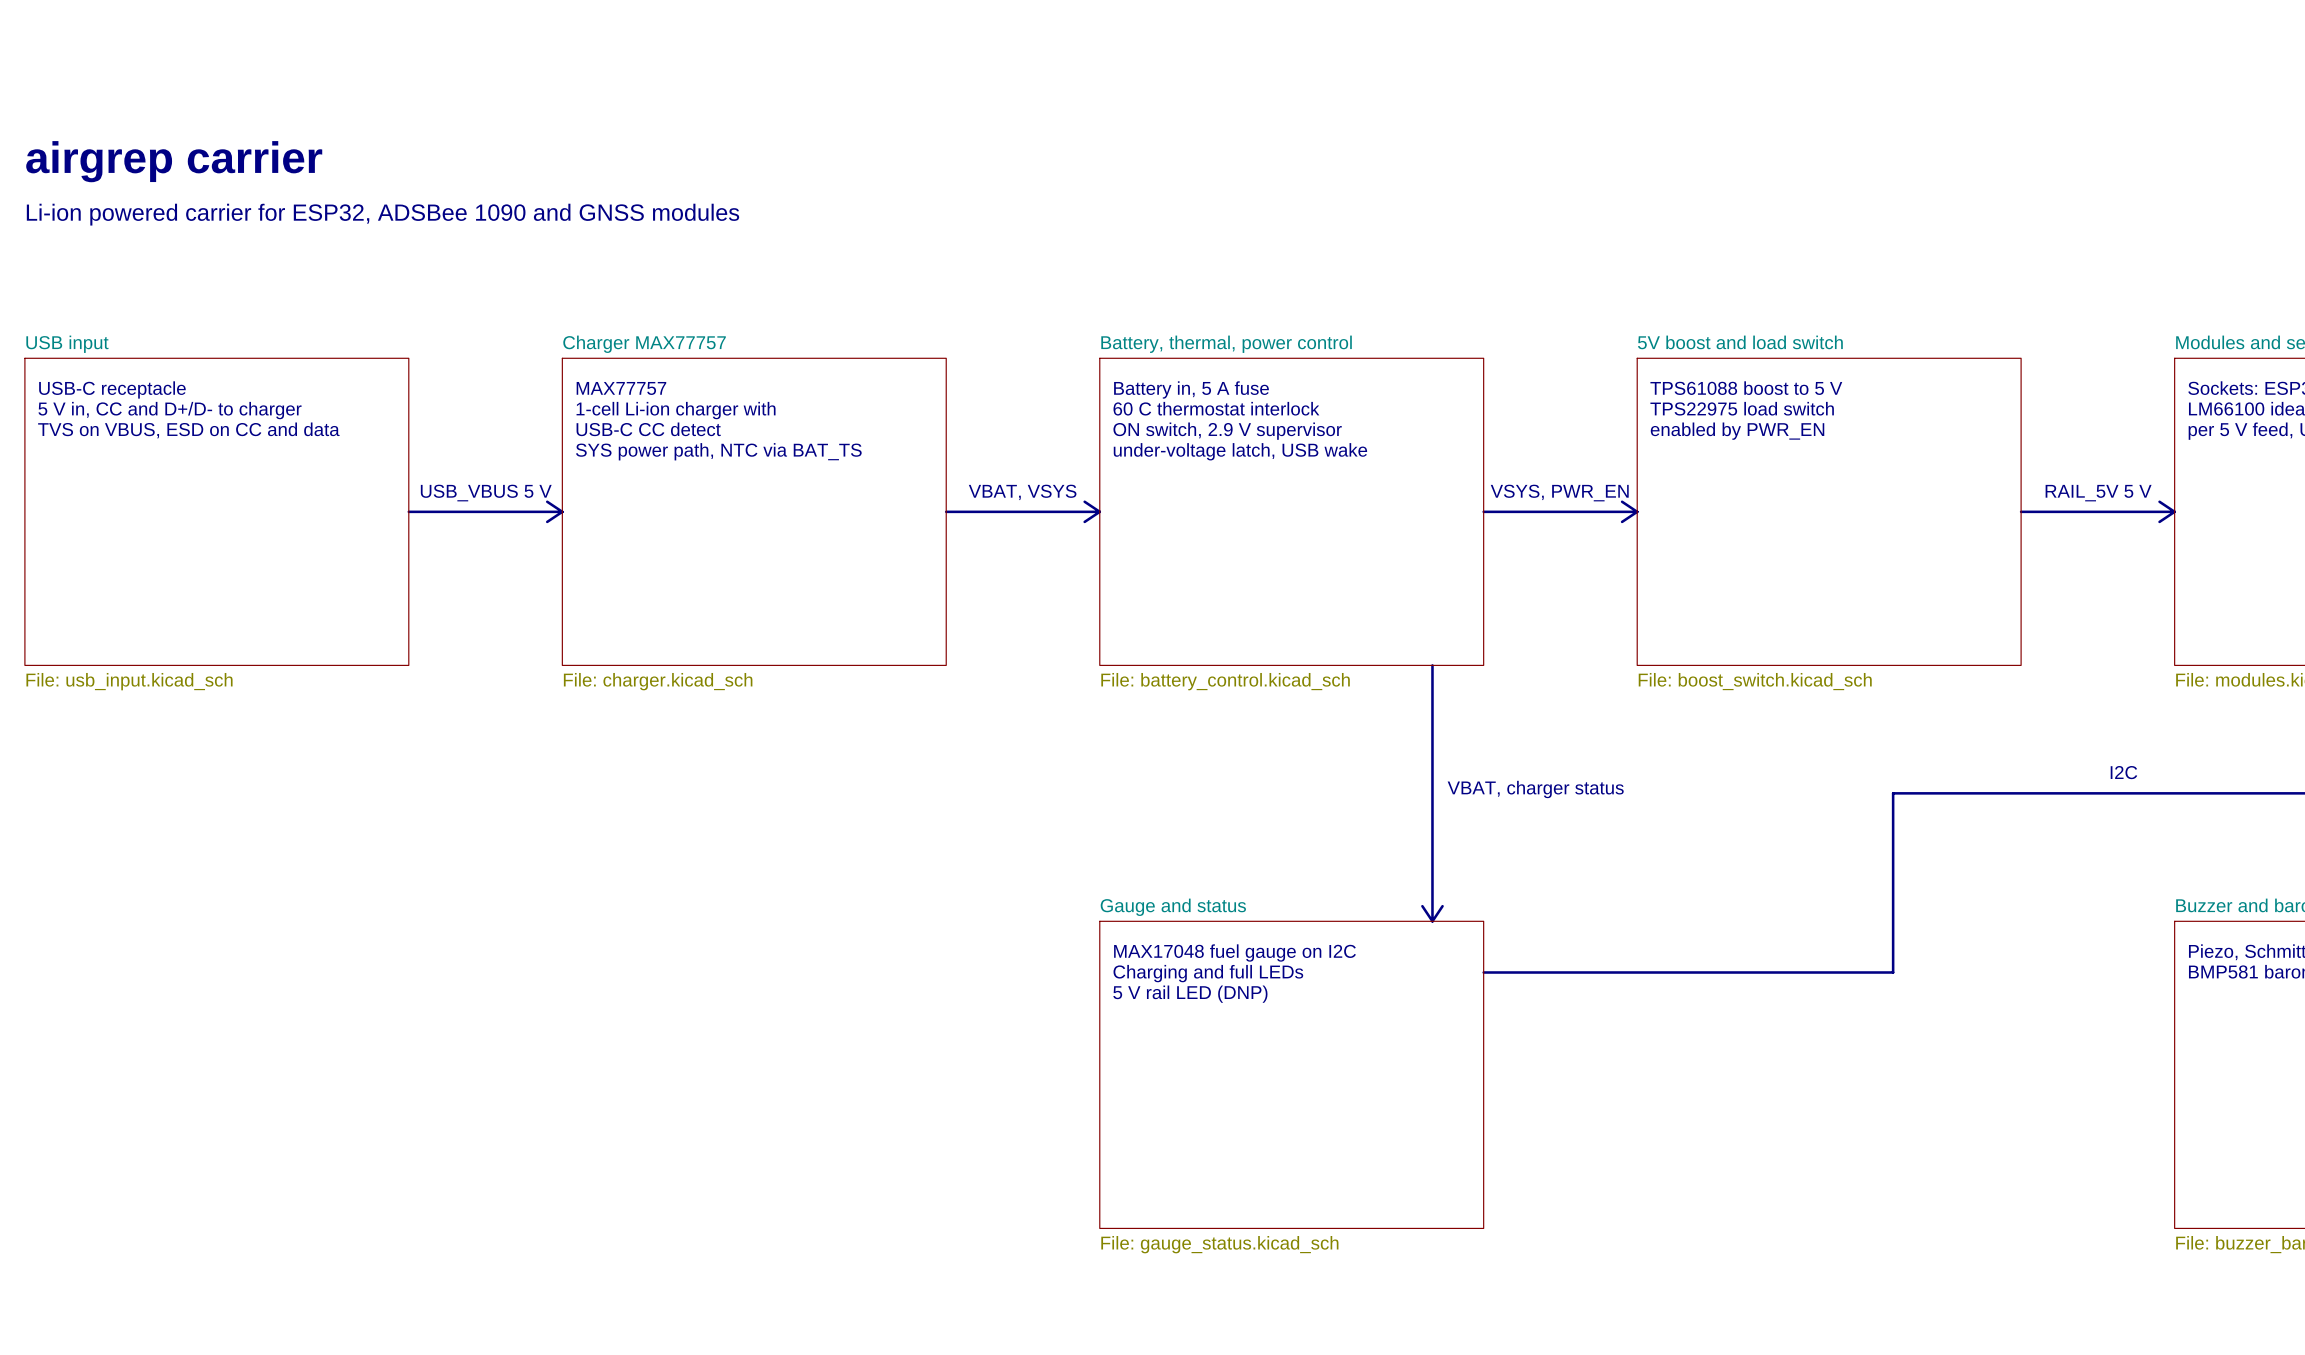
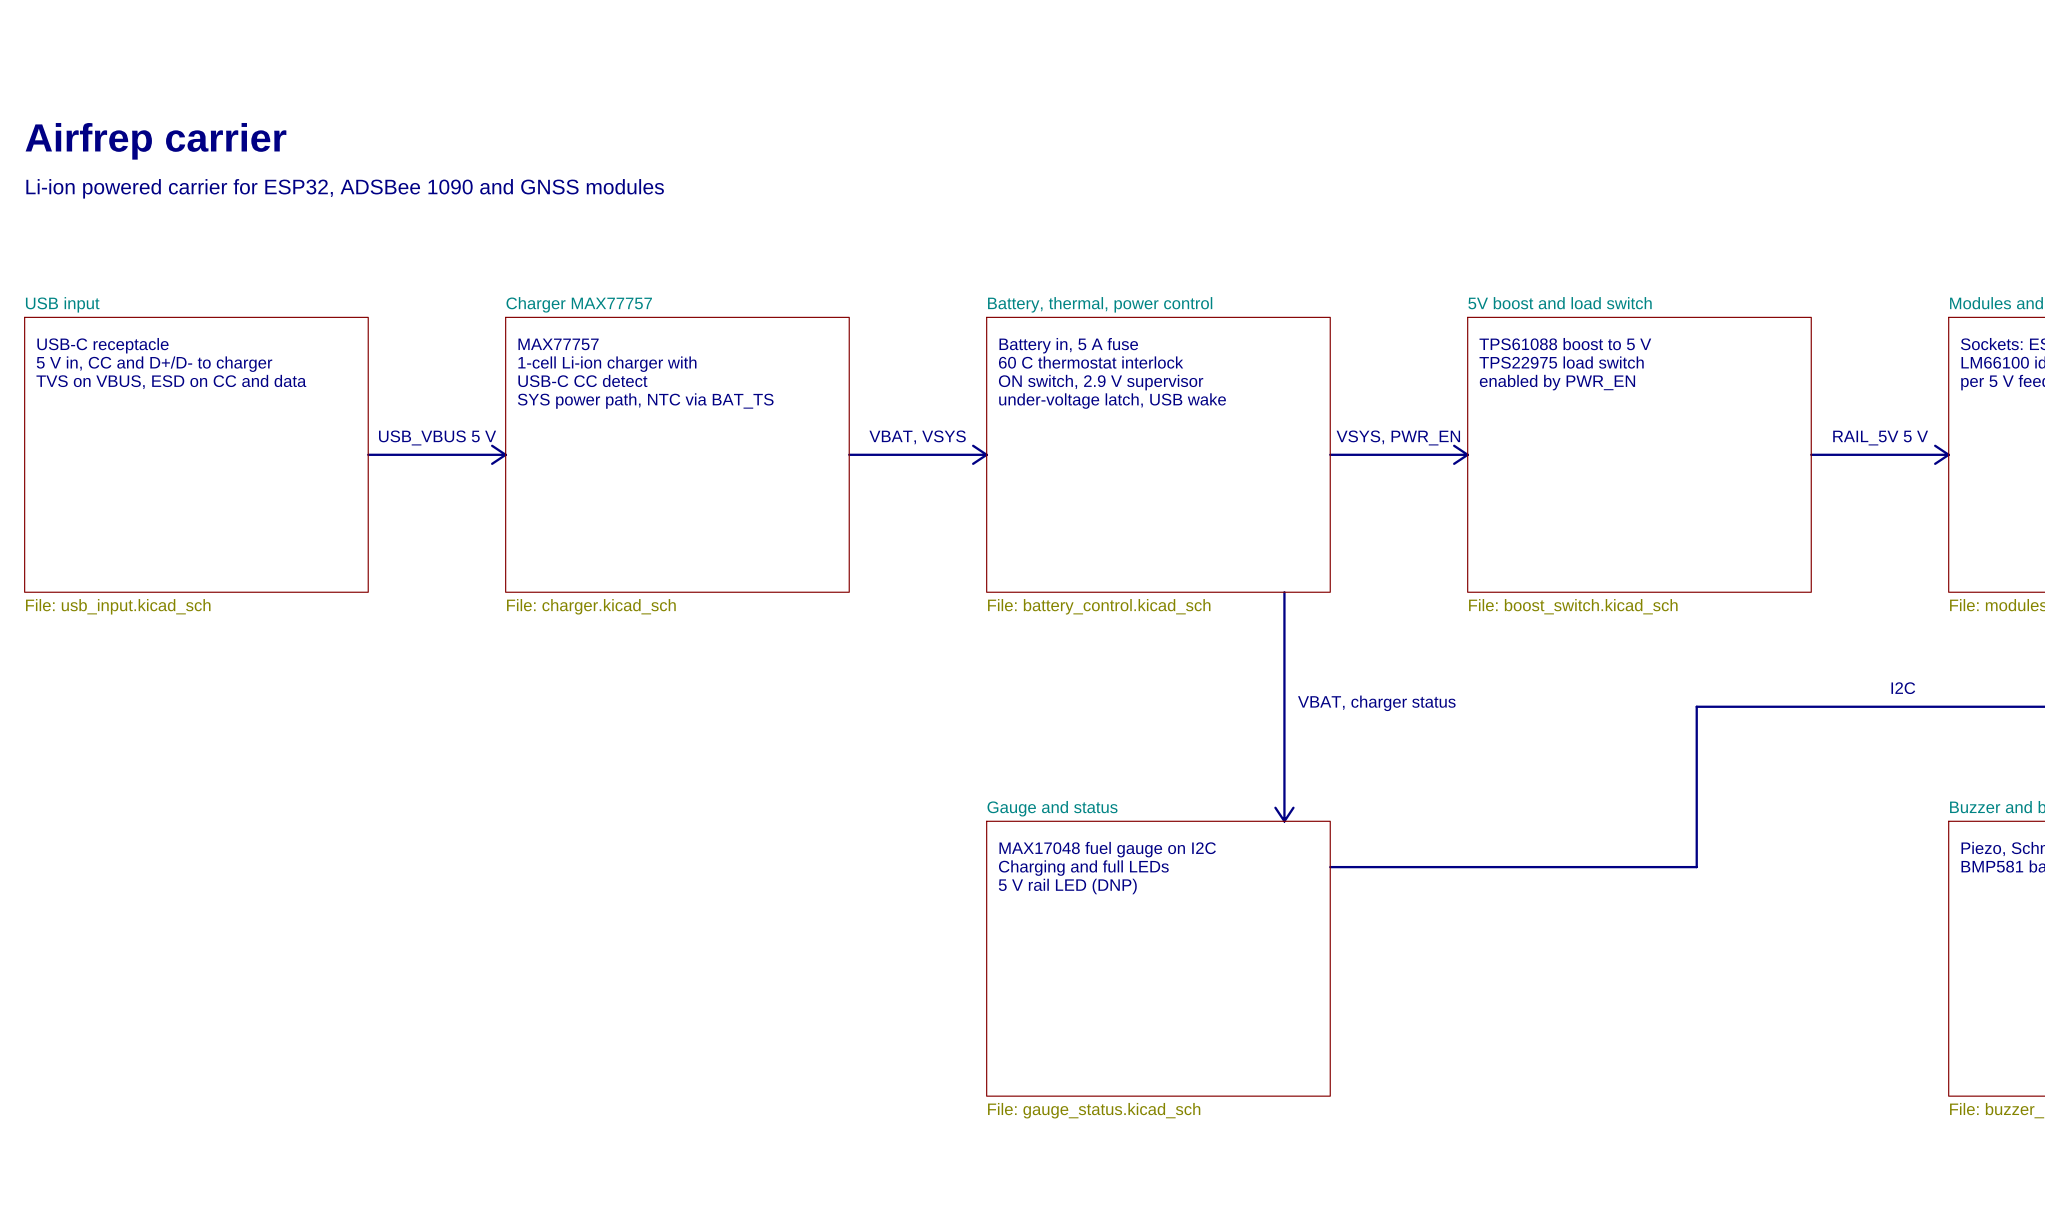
text: airgrep carrier (174, 161) -> Airfrep carrier (155, 141)

